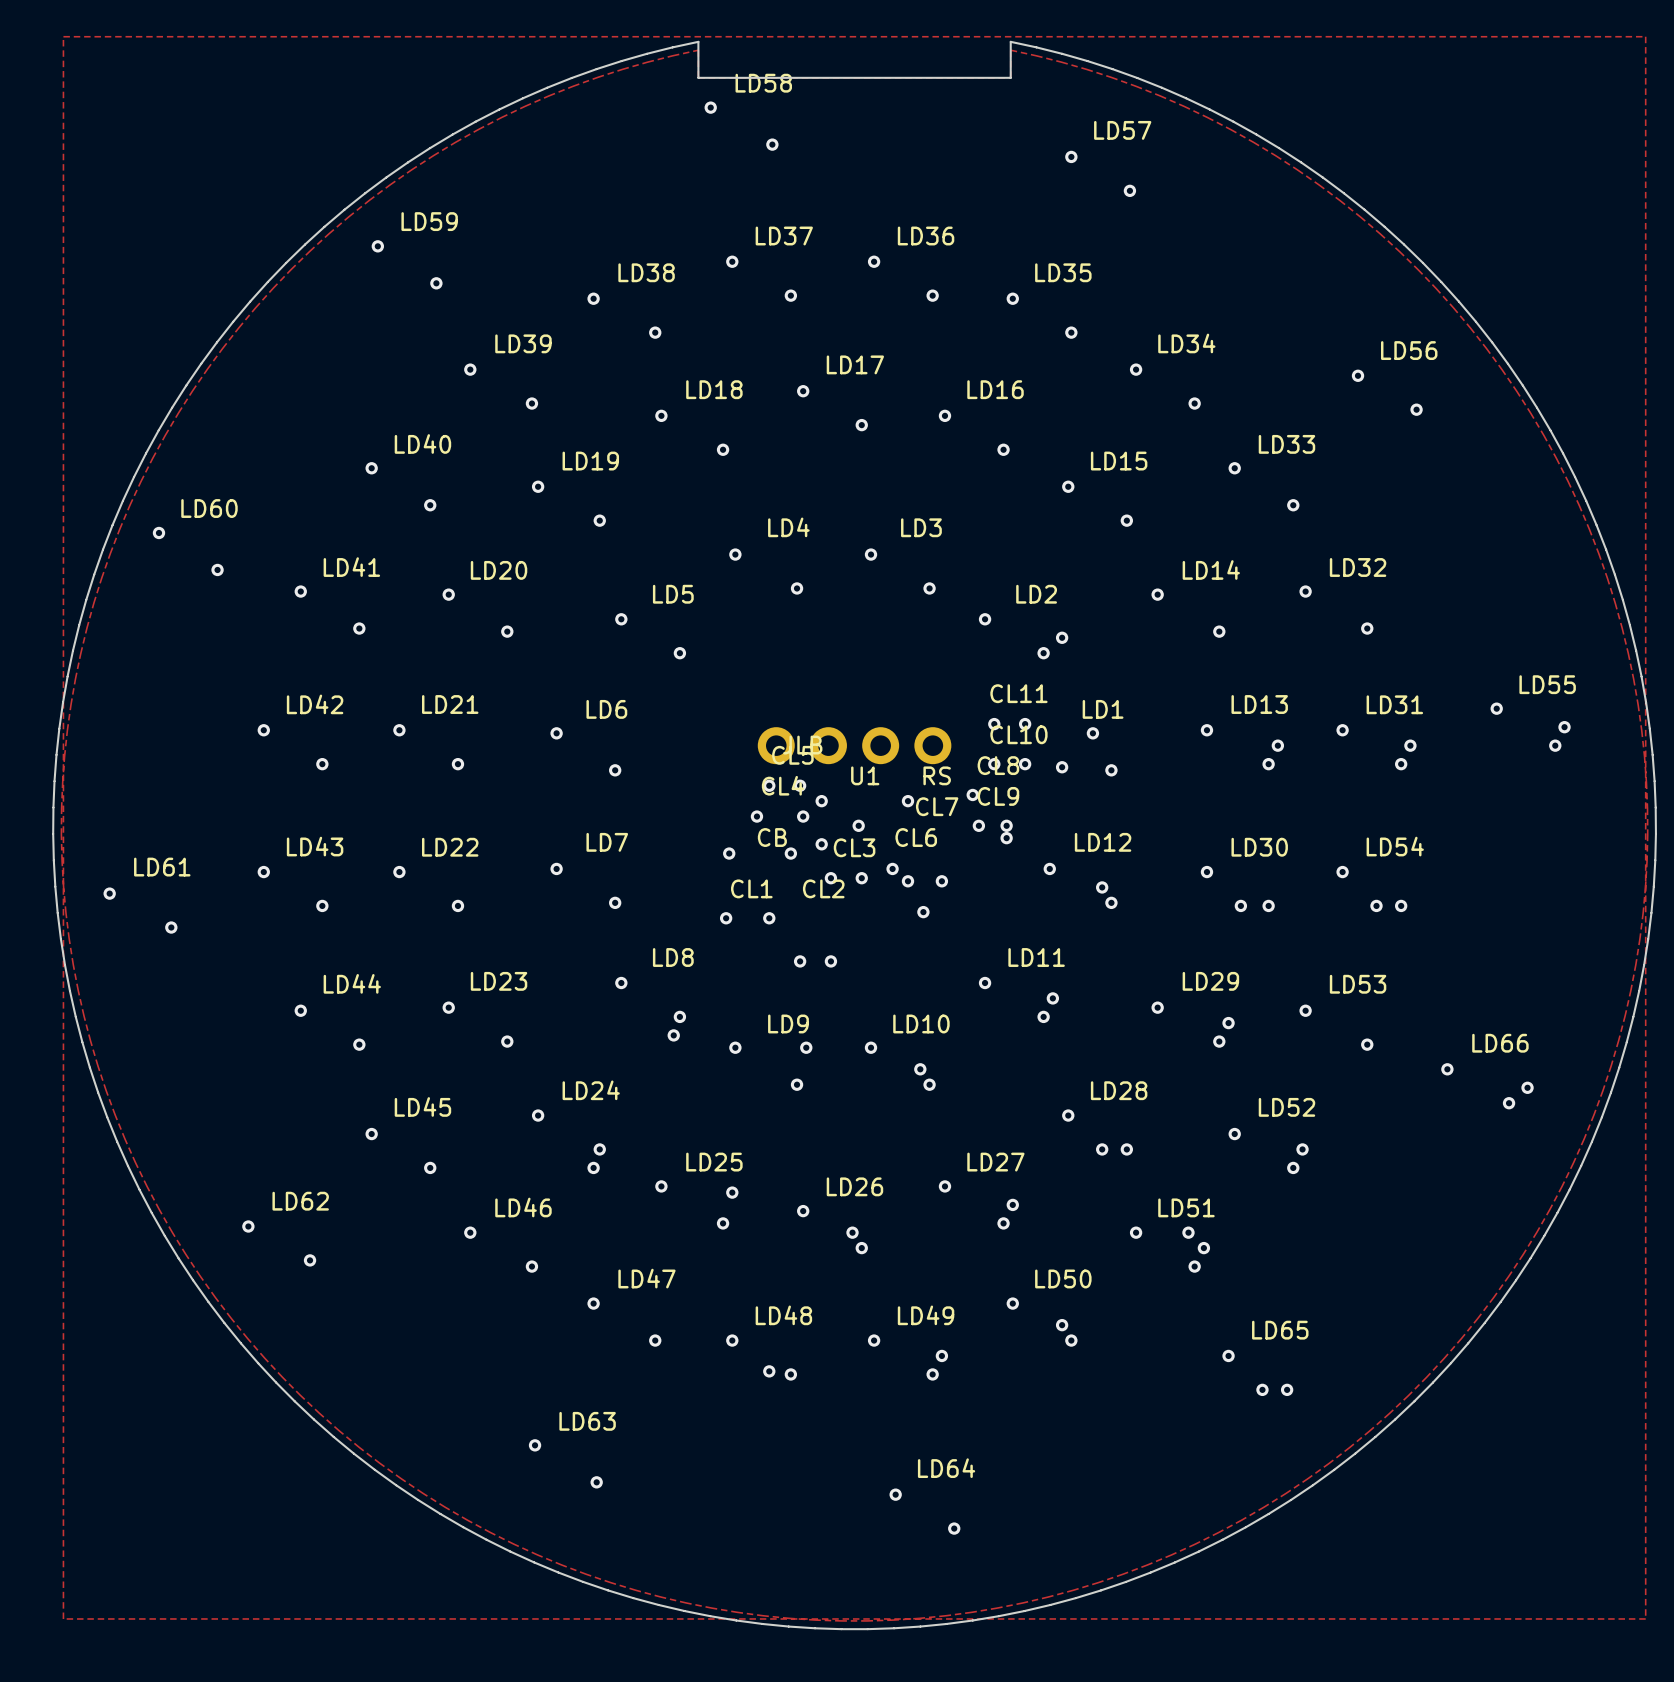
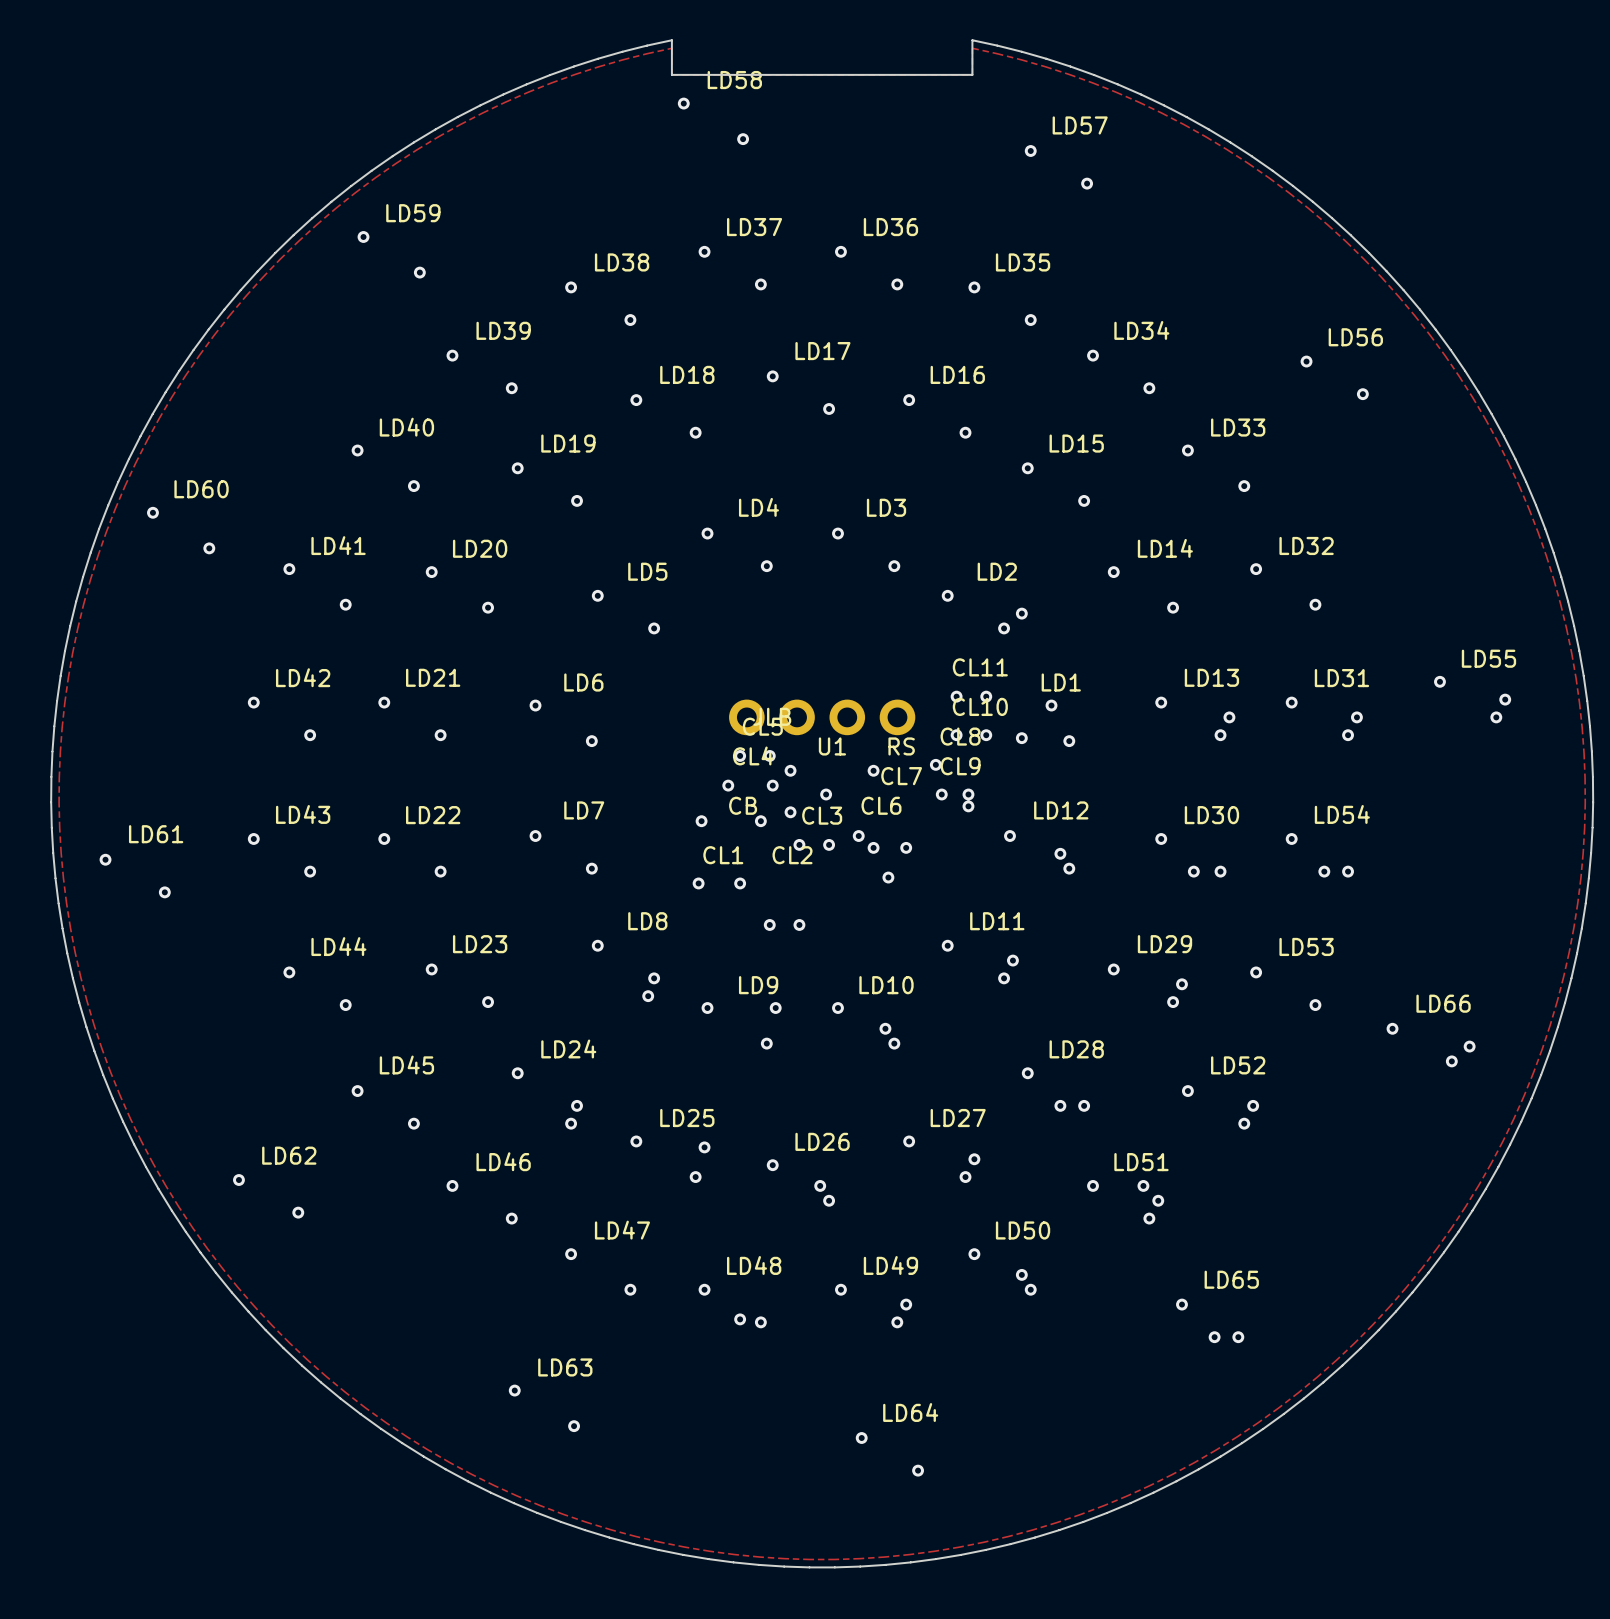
zone outline: (63, 36) (1645, 36) (1645, 1618) (63, 1618) (63, 36) -> none

